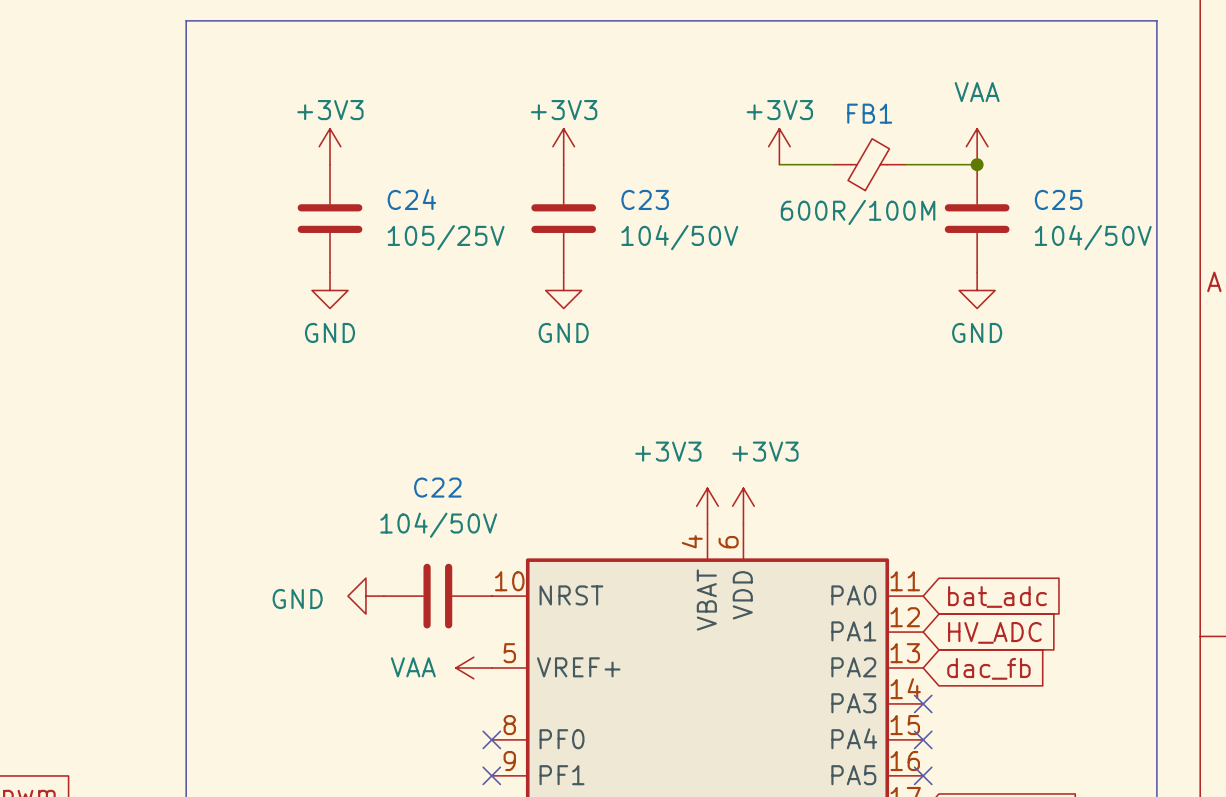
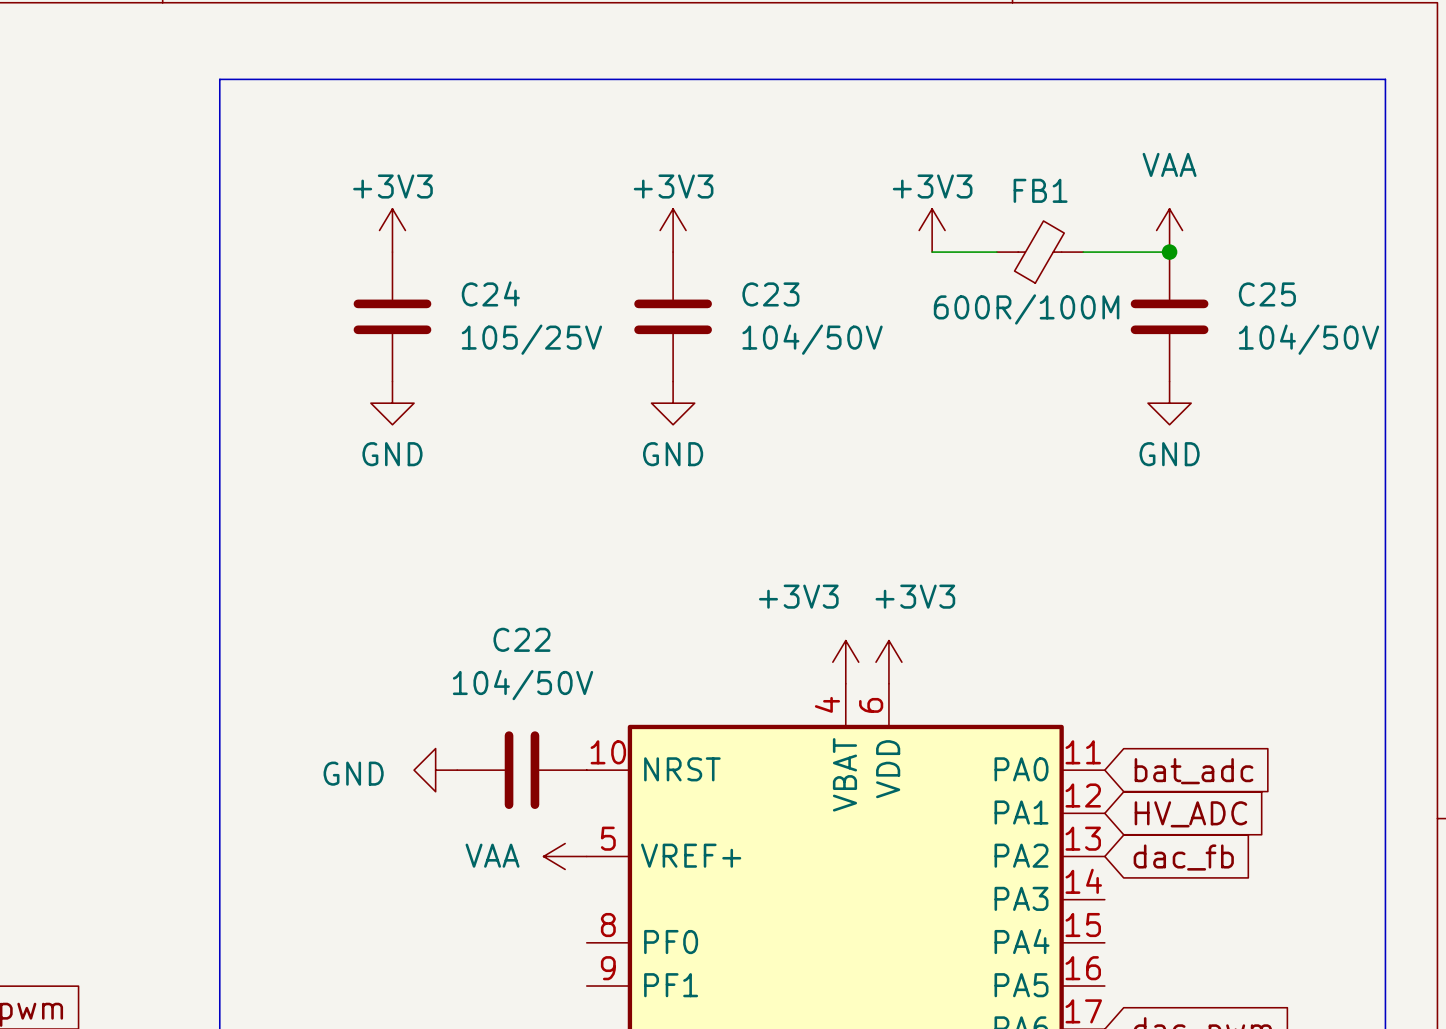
no-connect mark: (923, 703) -> none
no-connect mark: (491, 739) -> none
no-connect mark: (923, 739) -> none
no-connect mark: (491, 775) -> none
no-connect mark: (923, 775) -> none

